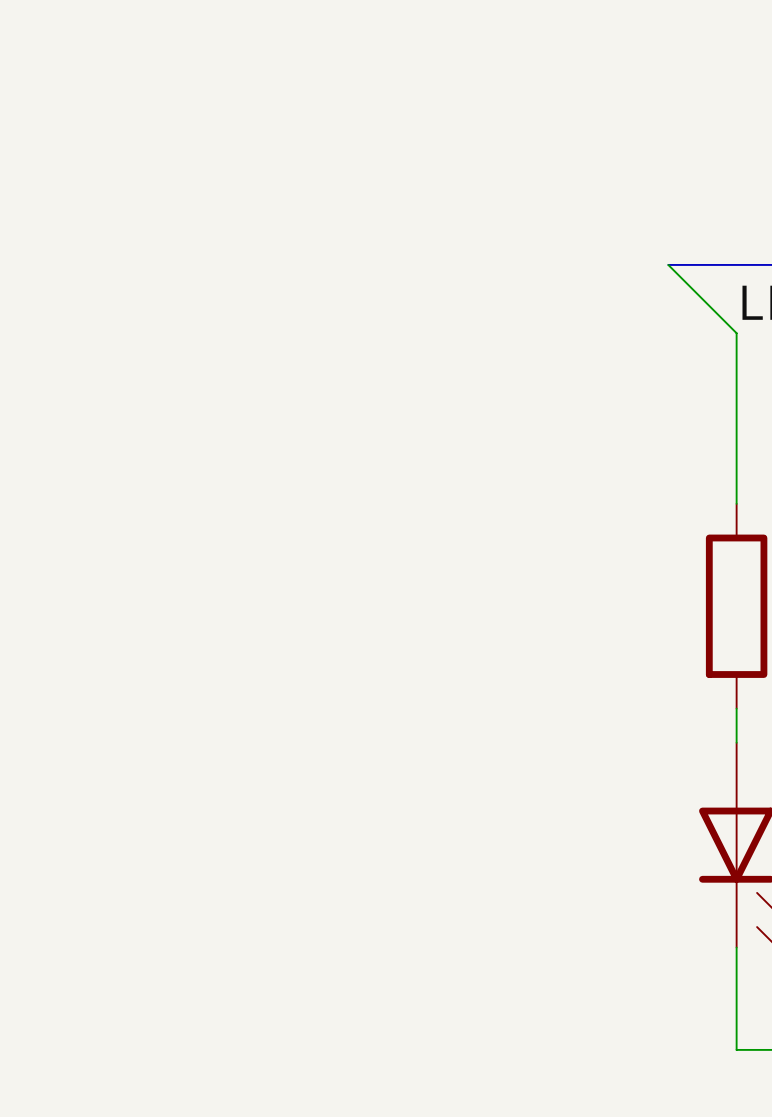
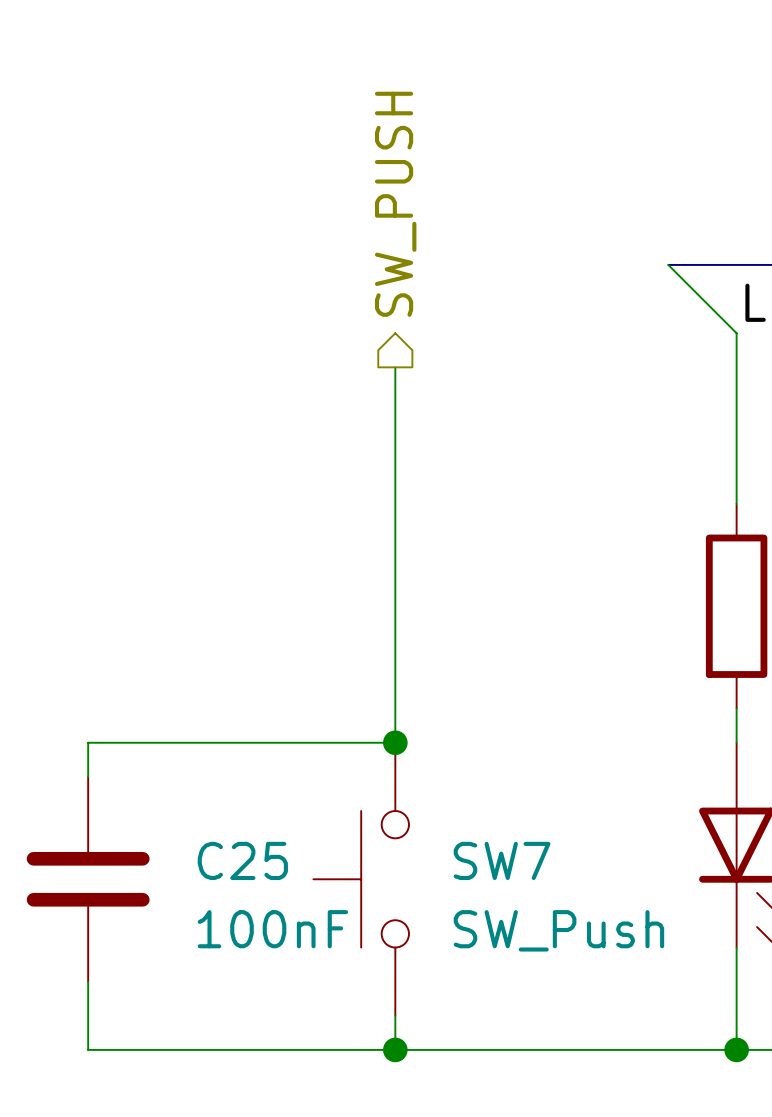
hierarchical label: none -> SW_PUSH (395, 204)
wire: none -> (395, 367) (395, 742) (88, 742) (88, 776)
junction: none -> (395, 742)
C25: none -> 100nF (88, 879)
SW7: none -> SW_Push (361, 879)
wire: none -> (88, 981) (88, 1049) (736, 1049)
wire: none -> (395, 1015) (395, 1049)
junction: none -> (395, 1049)
junction: none -> (736, 1049)

